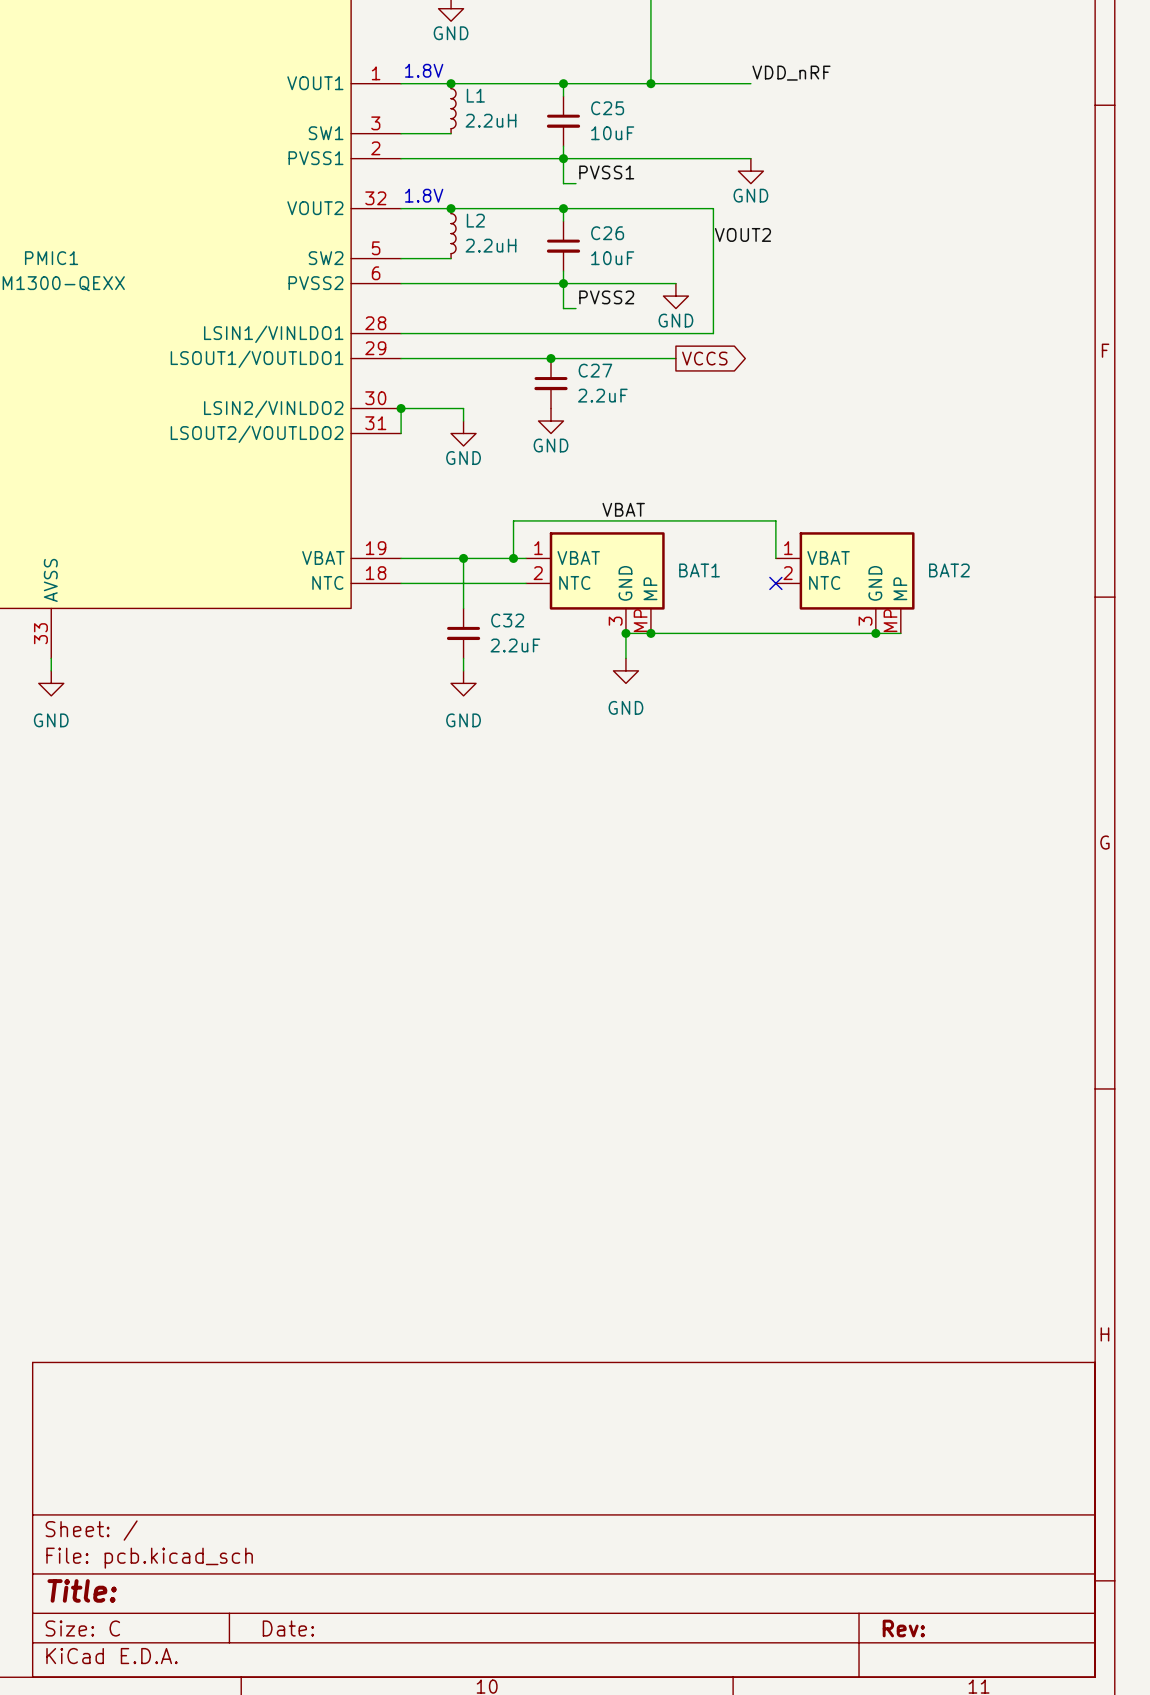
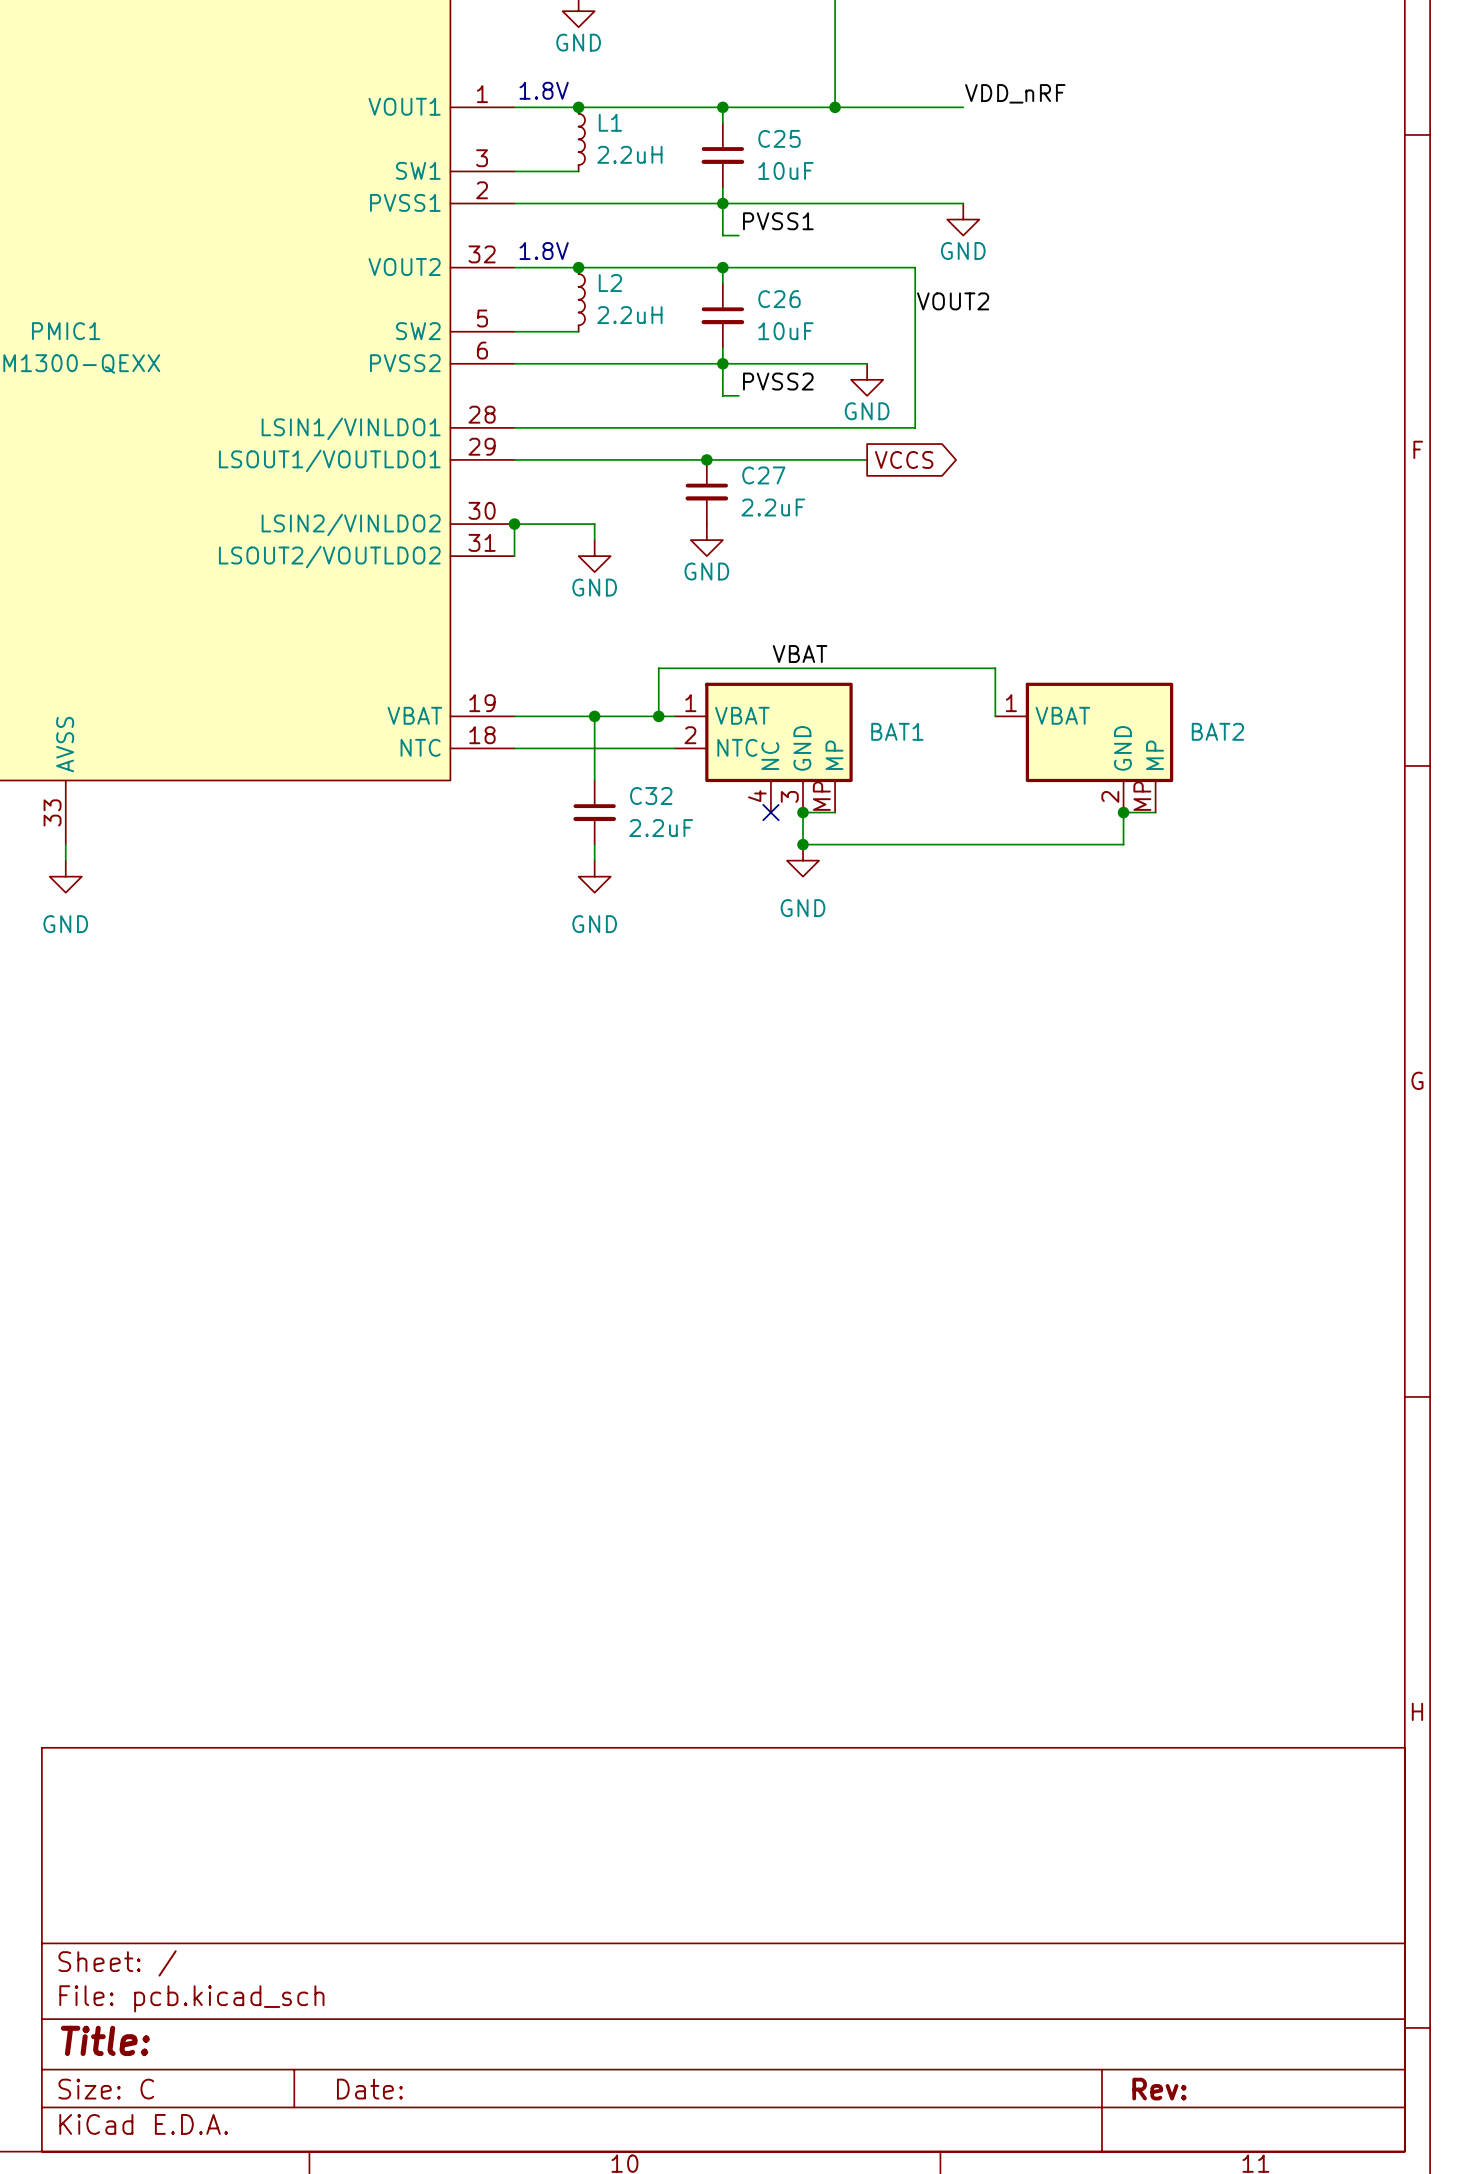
BAT1 symbol: [526, 532, 665, 634] -> [674, 682, 853, 813]
BAT2 symbol: [775, 532, 915, 634] -> [995, 682, 1174, 813]
no-connect mark: (775, 583) -> none
no-connect mark: none -> (770, 812)
wire: (650, 633) (875, 633) -> (803, 844) (1123, 844) (1123, 812)
junction position: (650, 633) -> (803, 844)

